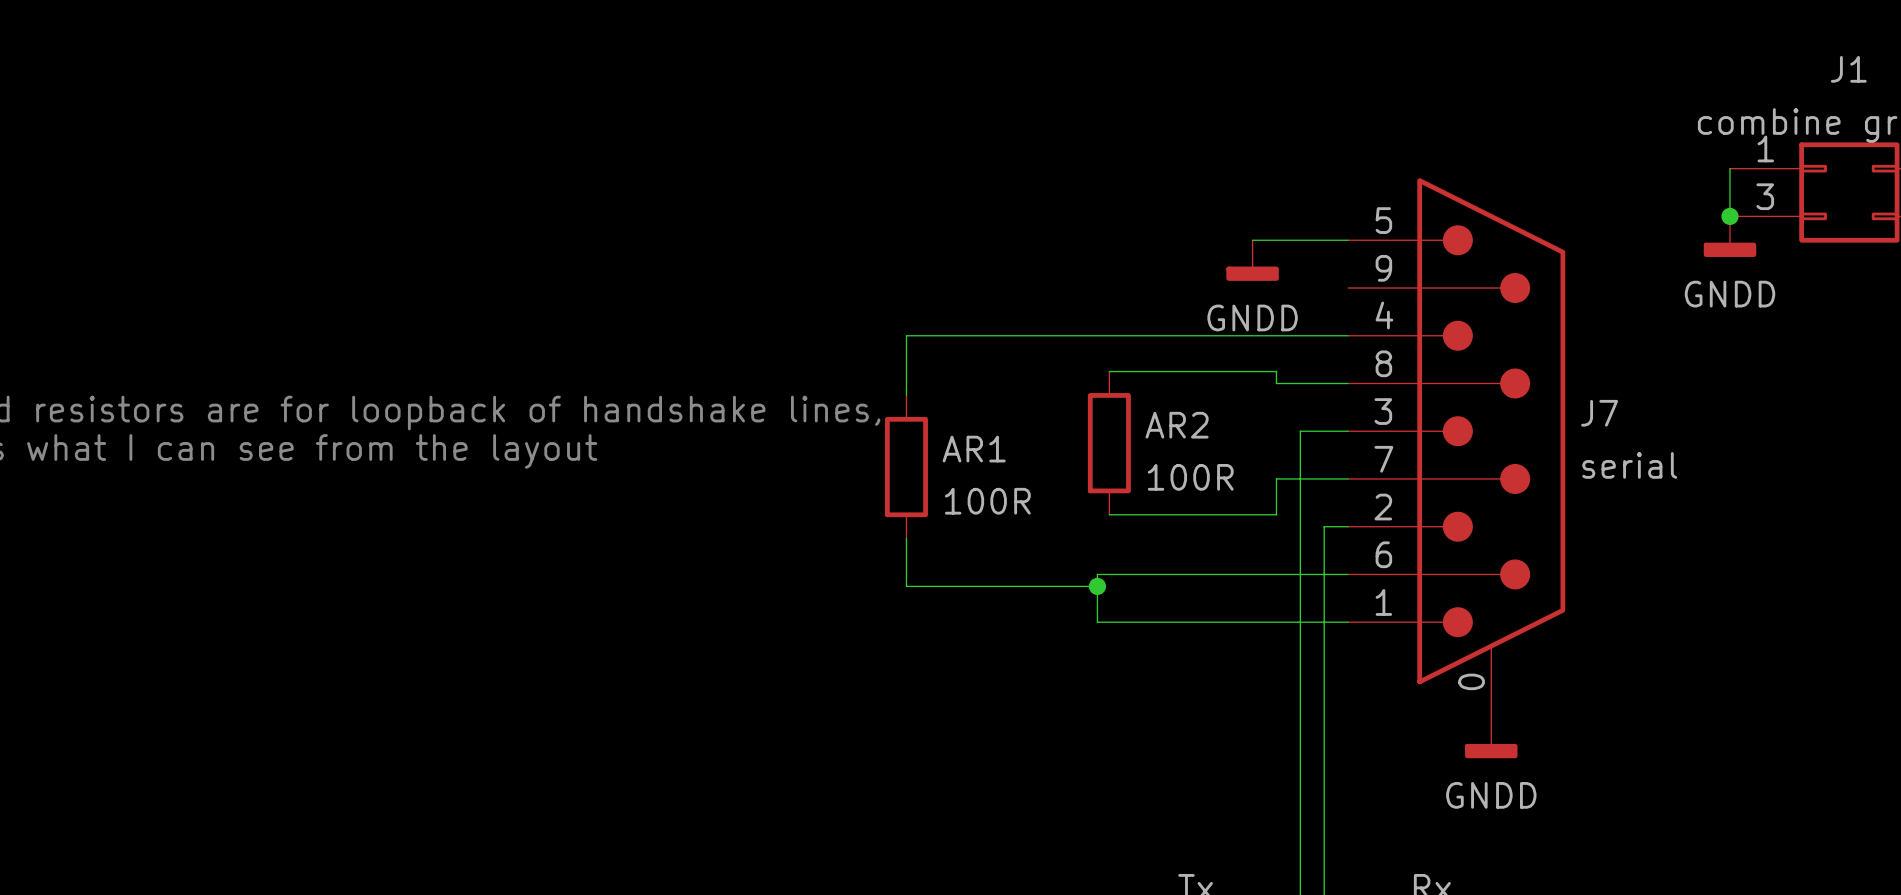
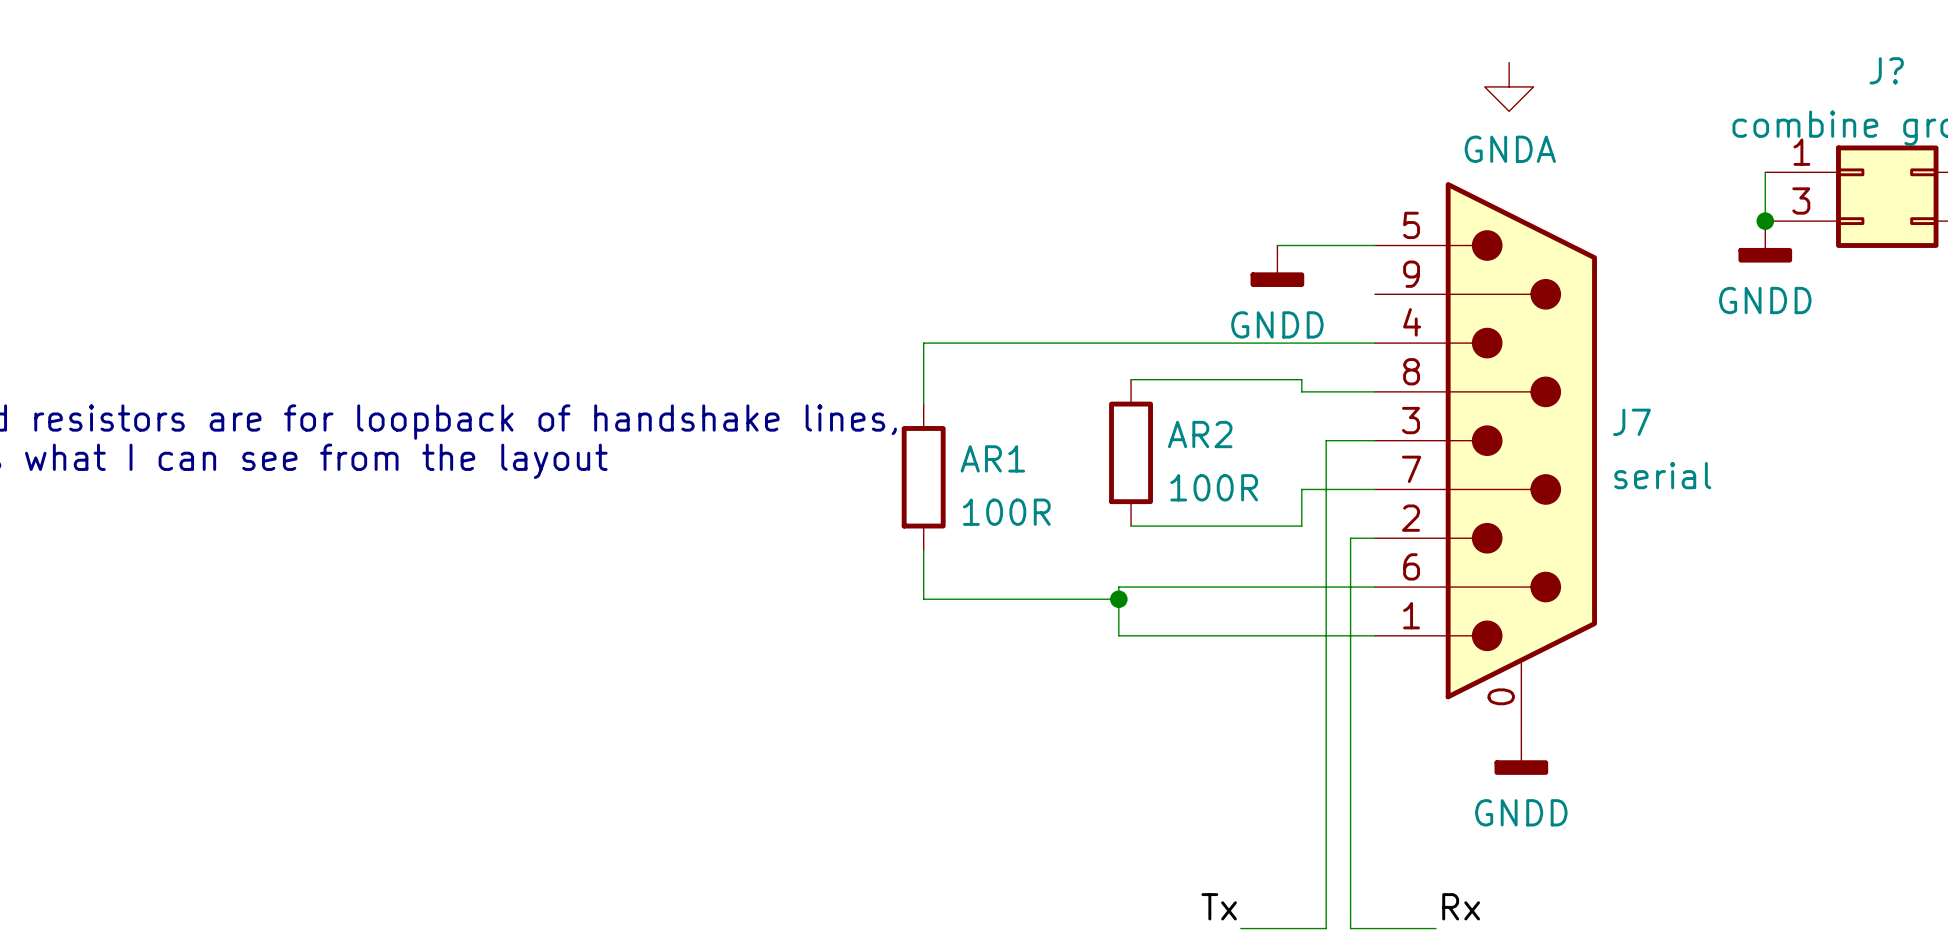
J1 name: J1 (1848, 69) -> J? (1886, 70)
power symbol: none -> GNDA (1509, 86)

